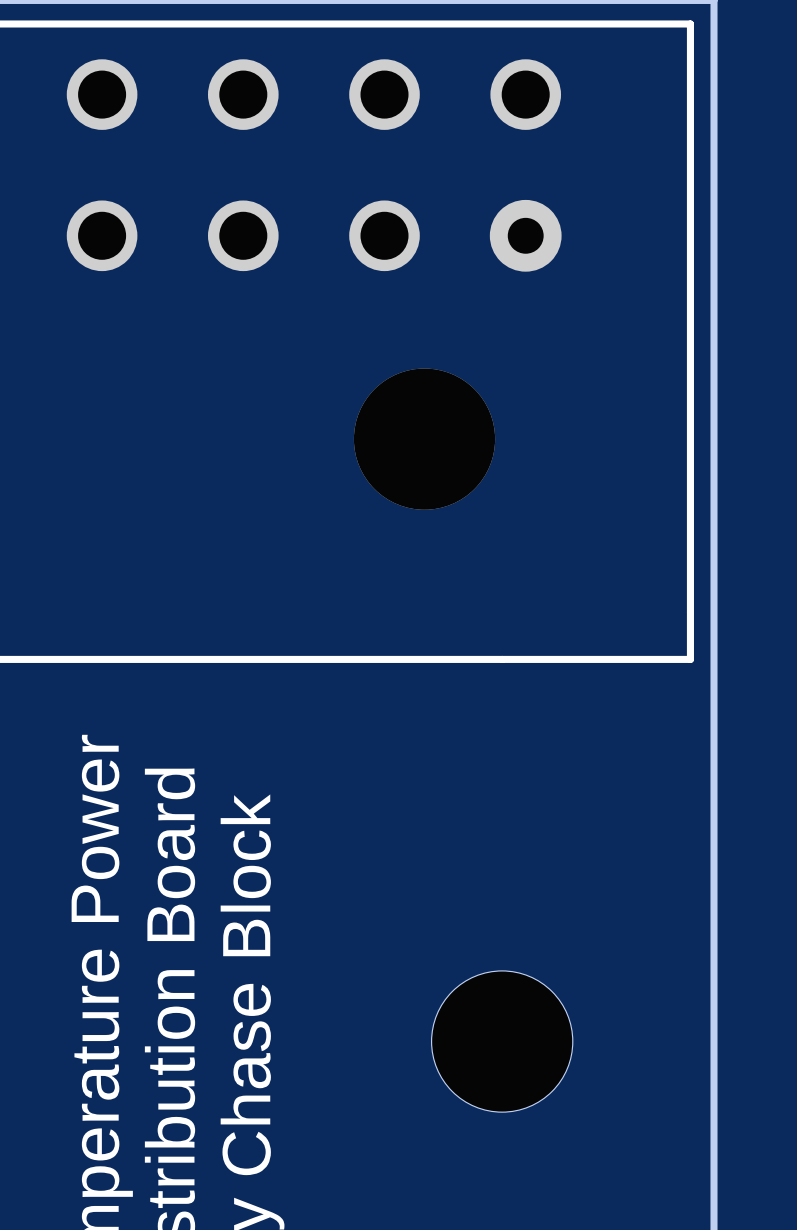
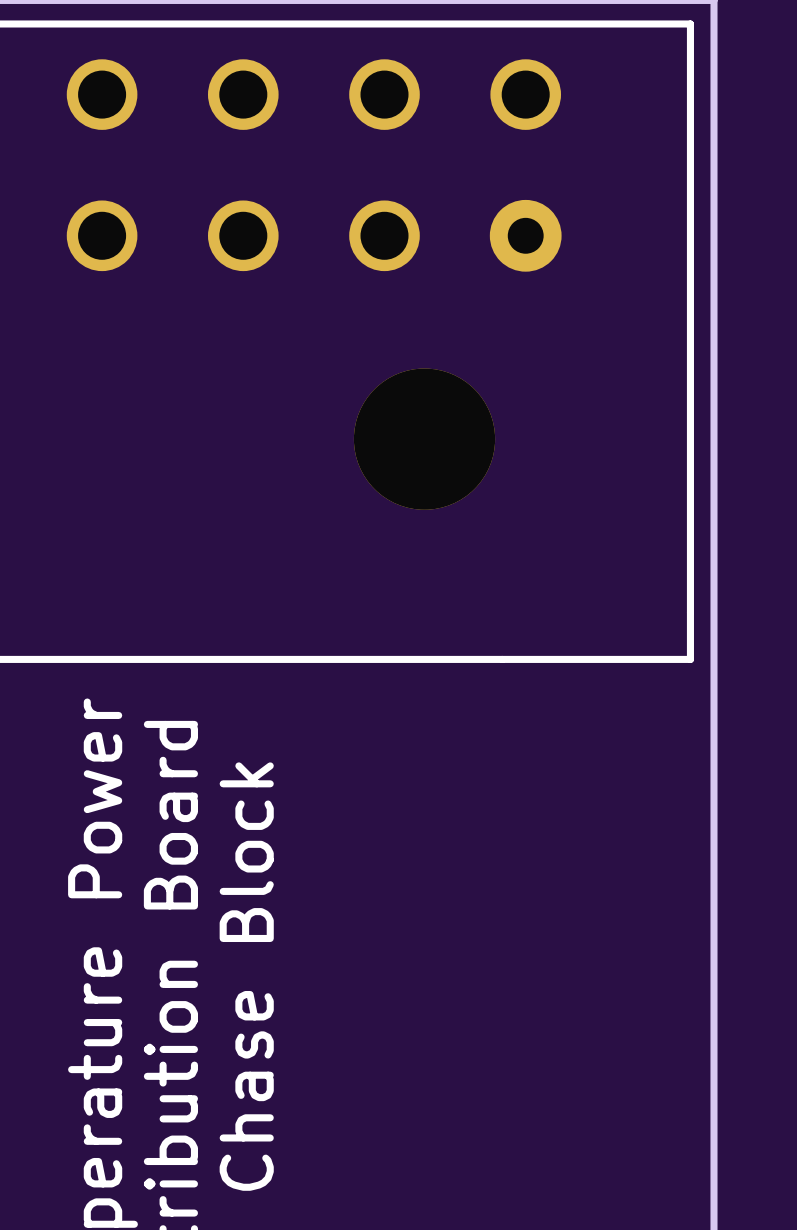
part: (502, 1041) -> none

